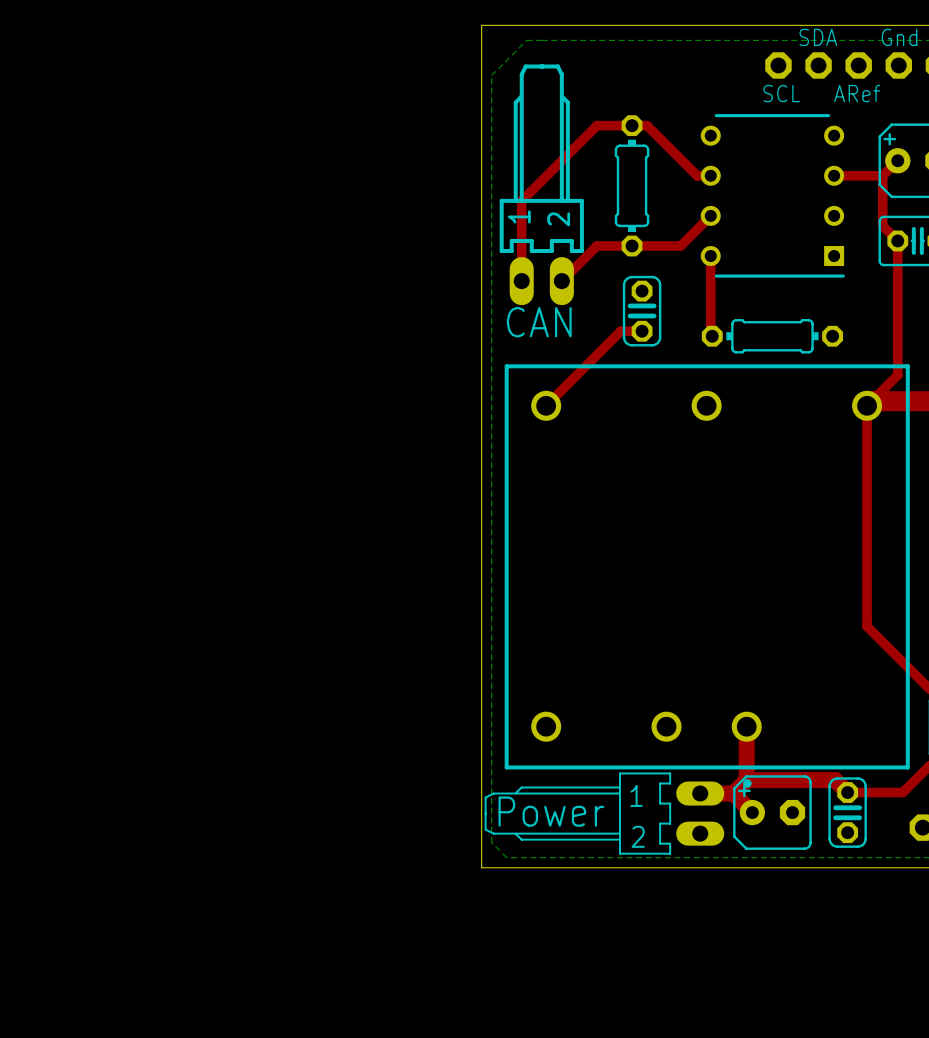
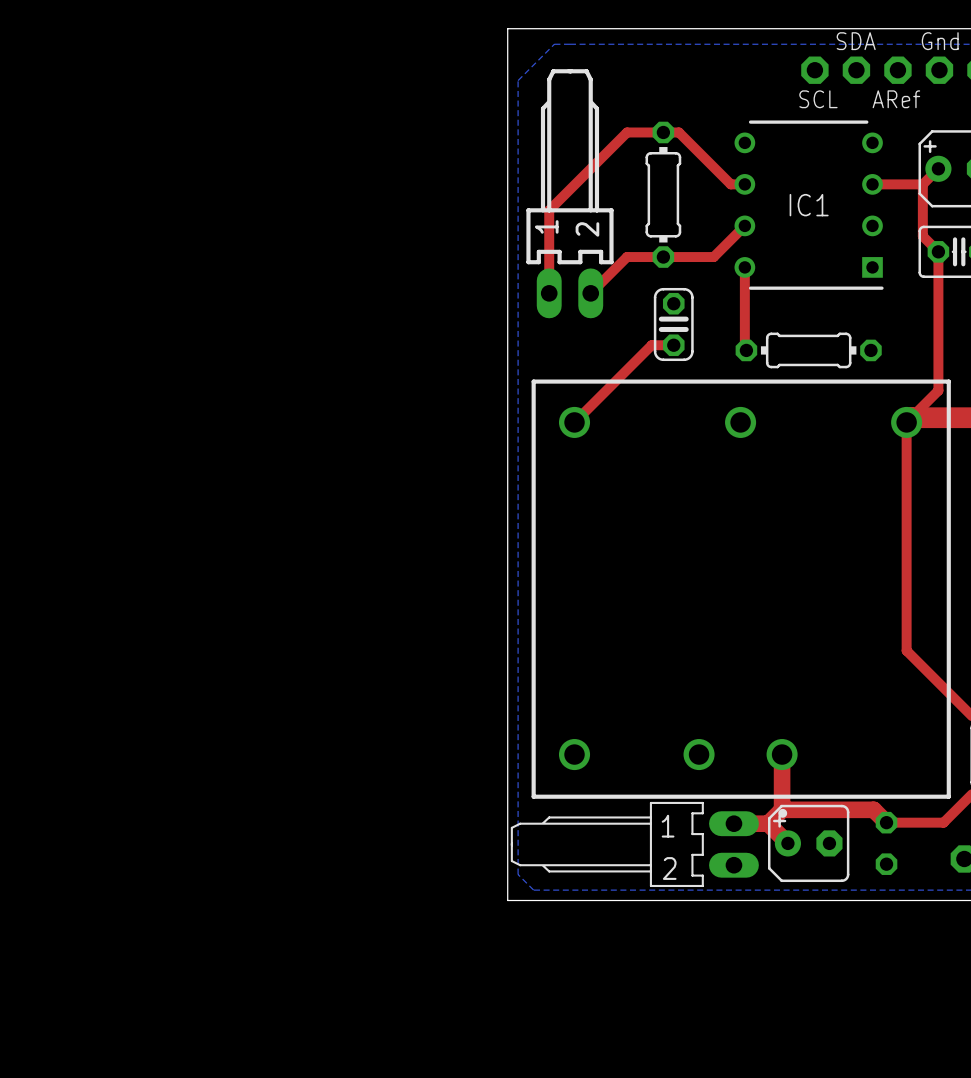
IC1 name: none -> IC1 (809, 205)
text: CAN (539, 322) -> none
text: Power (551, 811) -> none
part side: top (847, 812) -> bottom (886, 843)

